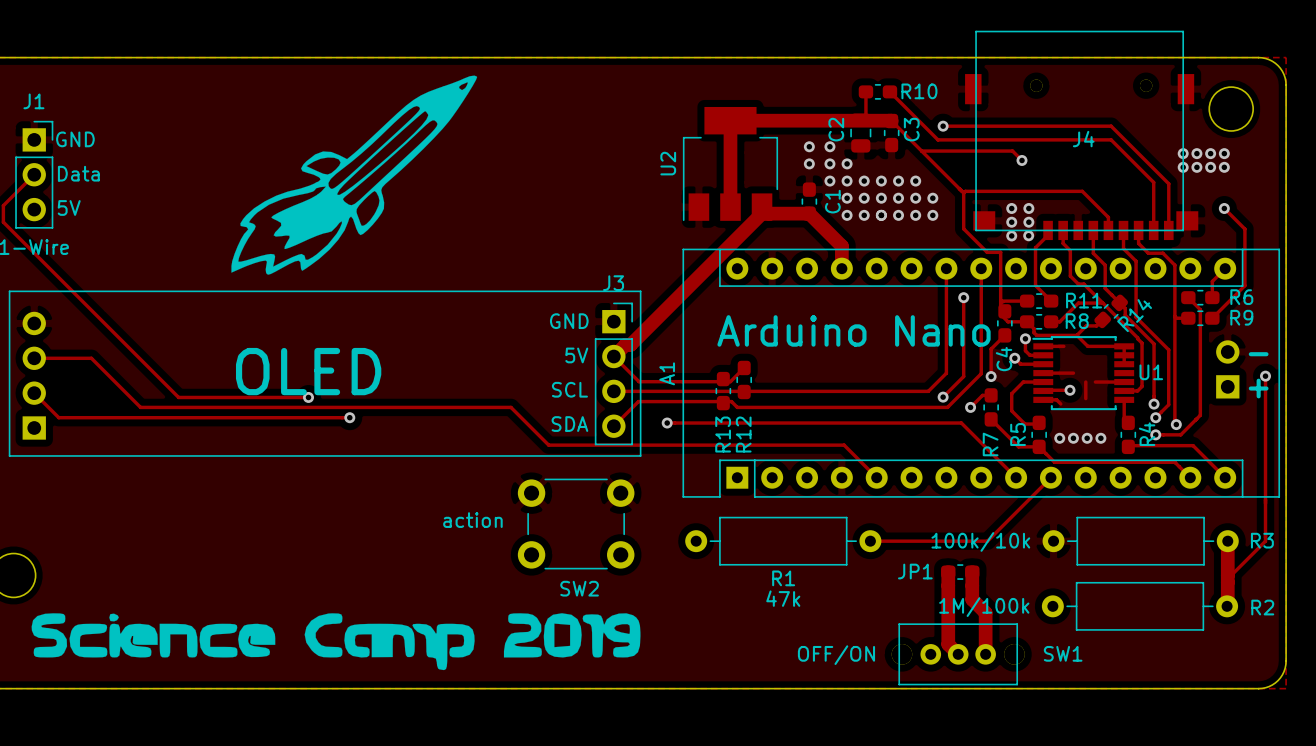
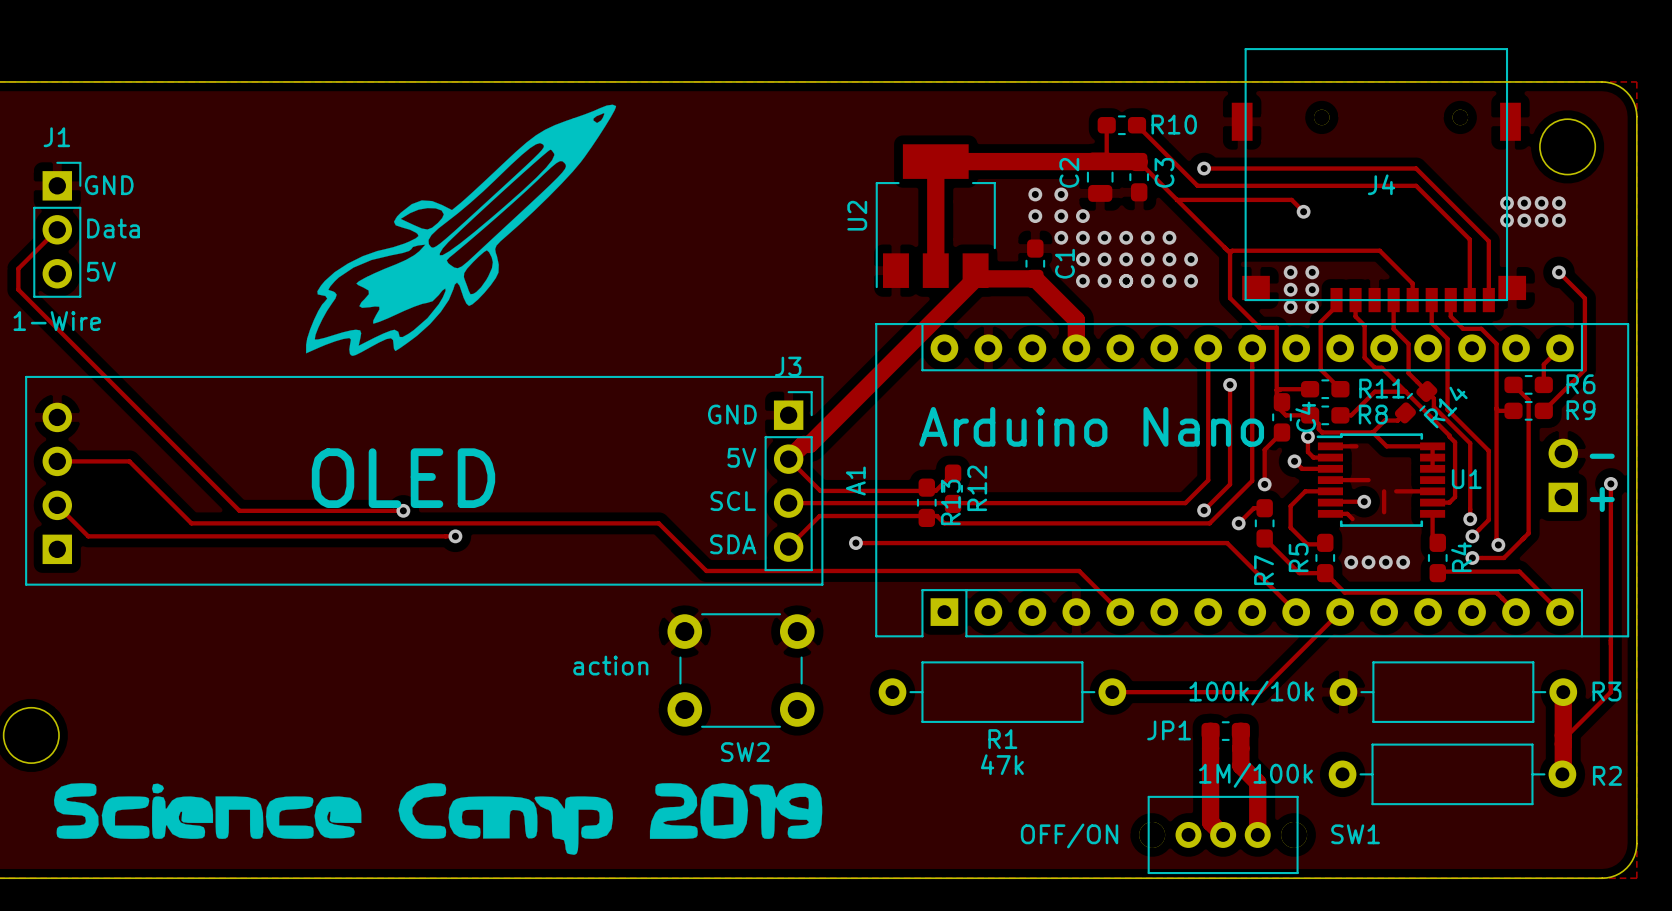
C4 name position: C4 (1004, 359) -> C4 (1305, 416)
R13 name position: R13 (723, 434) -> R13 (950, 502)
R12 name position: R12 (743, 434) -> R12 (977, 488)

